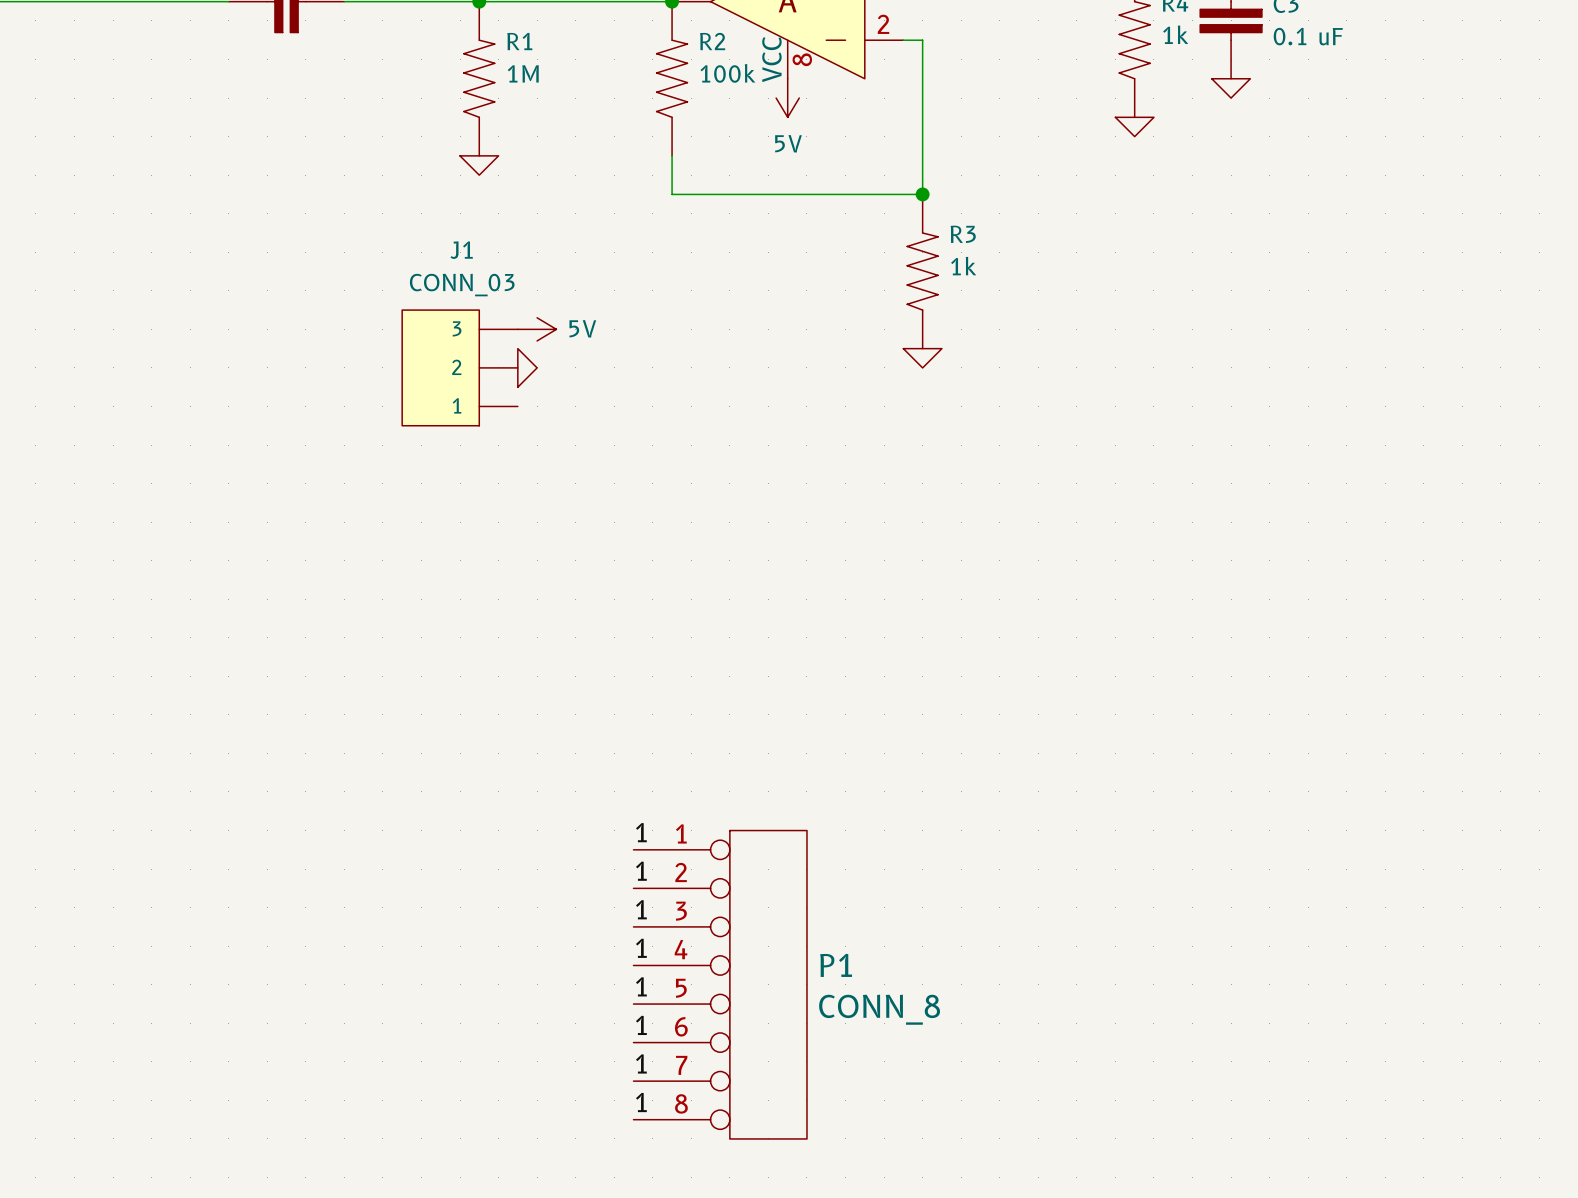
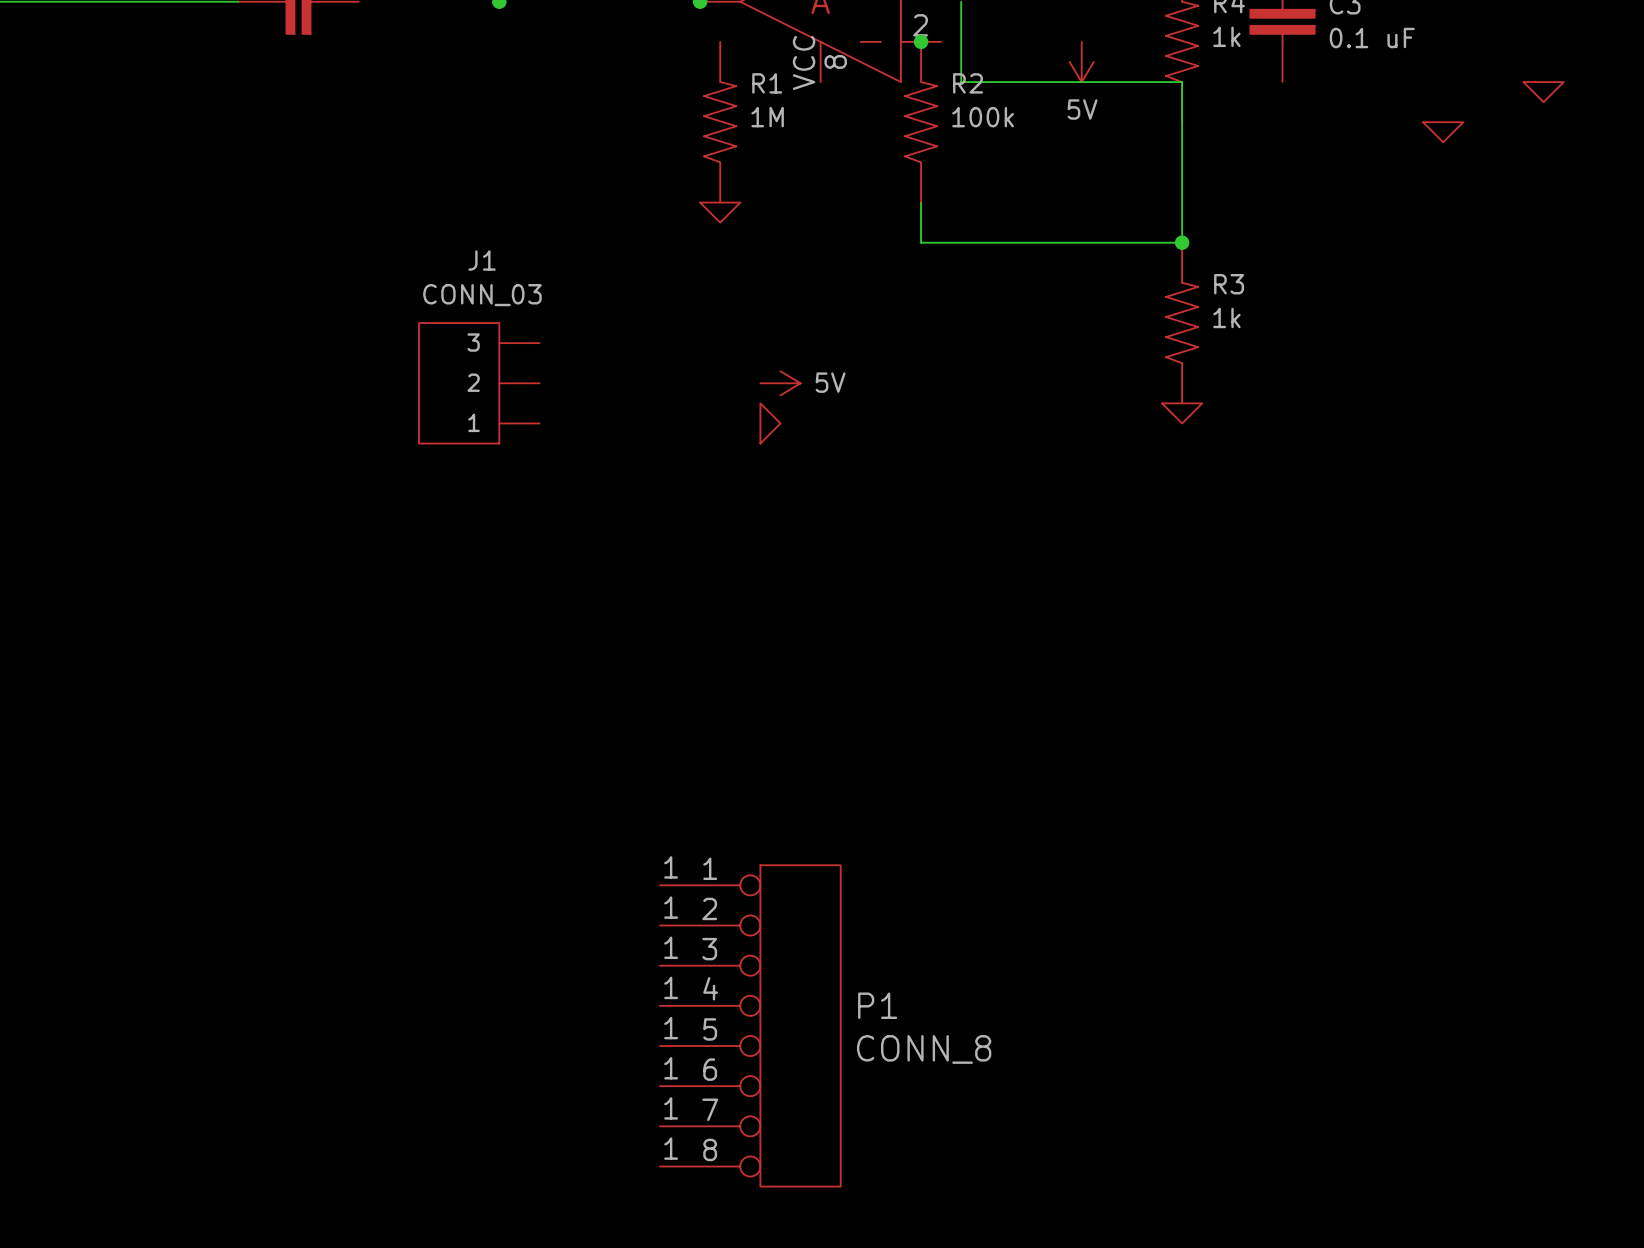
wire: (344, 1) (672, 1) -> none
junction: none -> (921, 41)
wire: (903, 40) (922, 40) -> (961, 1) (961, 41)
power symbol: none -> 5V (1081, 61)
R1 position: (479, 78) -> (720, 122)
R2 position: (672, 78) -> (921, 122)
wire: (922, 78) (922, 194) (672, 194) (672, 155) -> (961, 82) (1182, 82) (1182, 242) (921, 242) (921, 202)
power symbol: (1231, 88) -> none
power symbol: none -> (1543, 92)
power symbol: 5V (787, 98) -> none
power symbol: (1134, 126) -> none
power symbol: none -> (1443, 132)
power symbol: (479, 165) -> none
junction: (922, 194) -> none
power symbol: none -> (720, 212)
junction: none -> (1182, 242)
R3 position: (922, 271) -> (1182, 323)
power symbol: 5V (537, 329) -> none
power symbol: (922, 358) -> none
power symbol: (527, 367) -> none
power symbol: none -> 5V (780, 383)
power symbol: none -> (1182, 413)
power symbol: none -> (770, 423)

